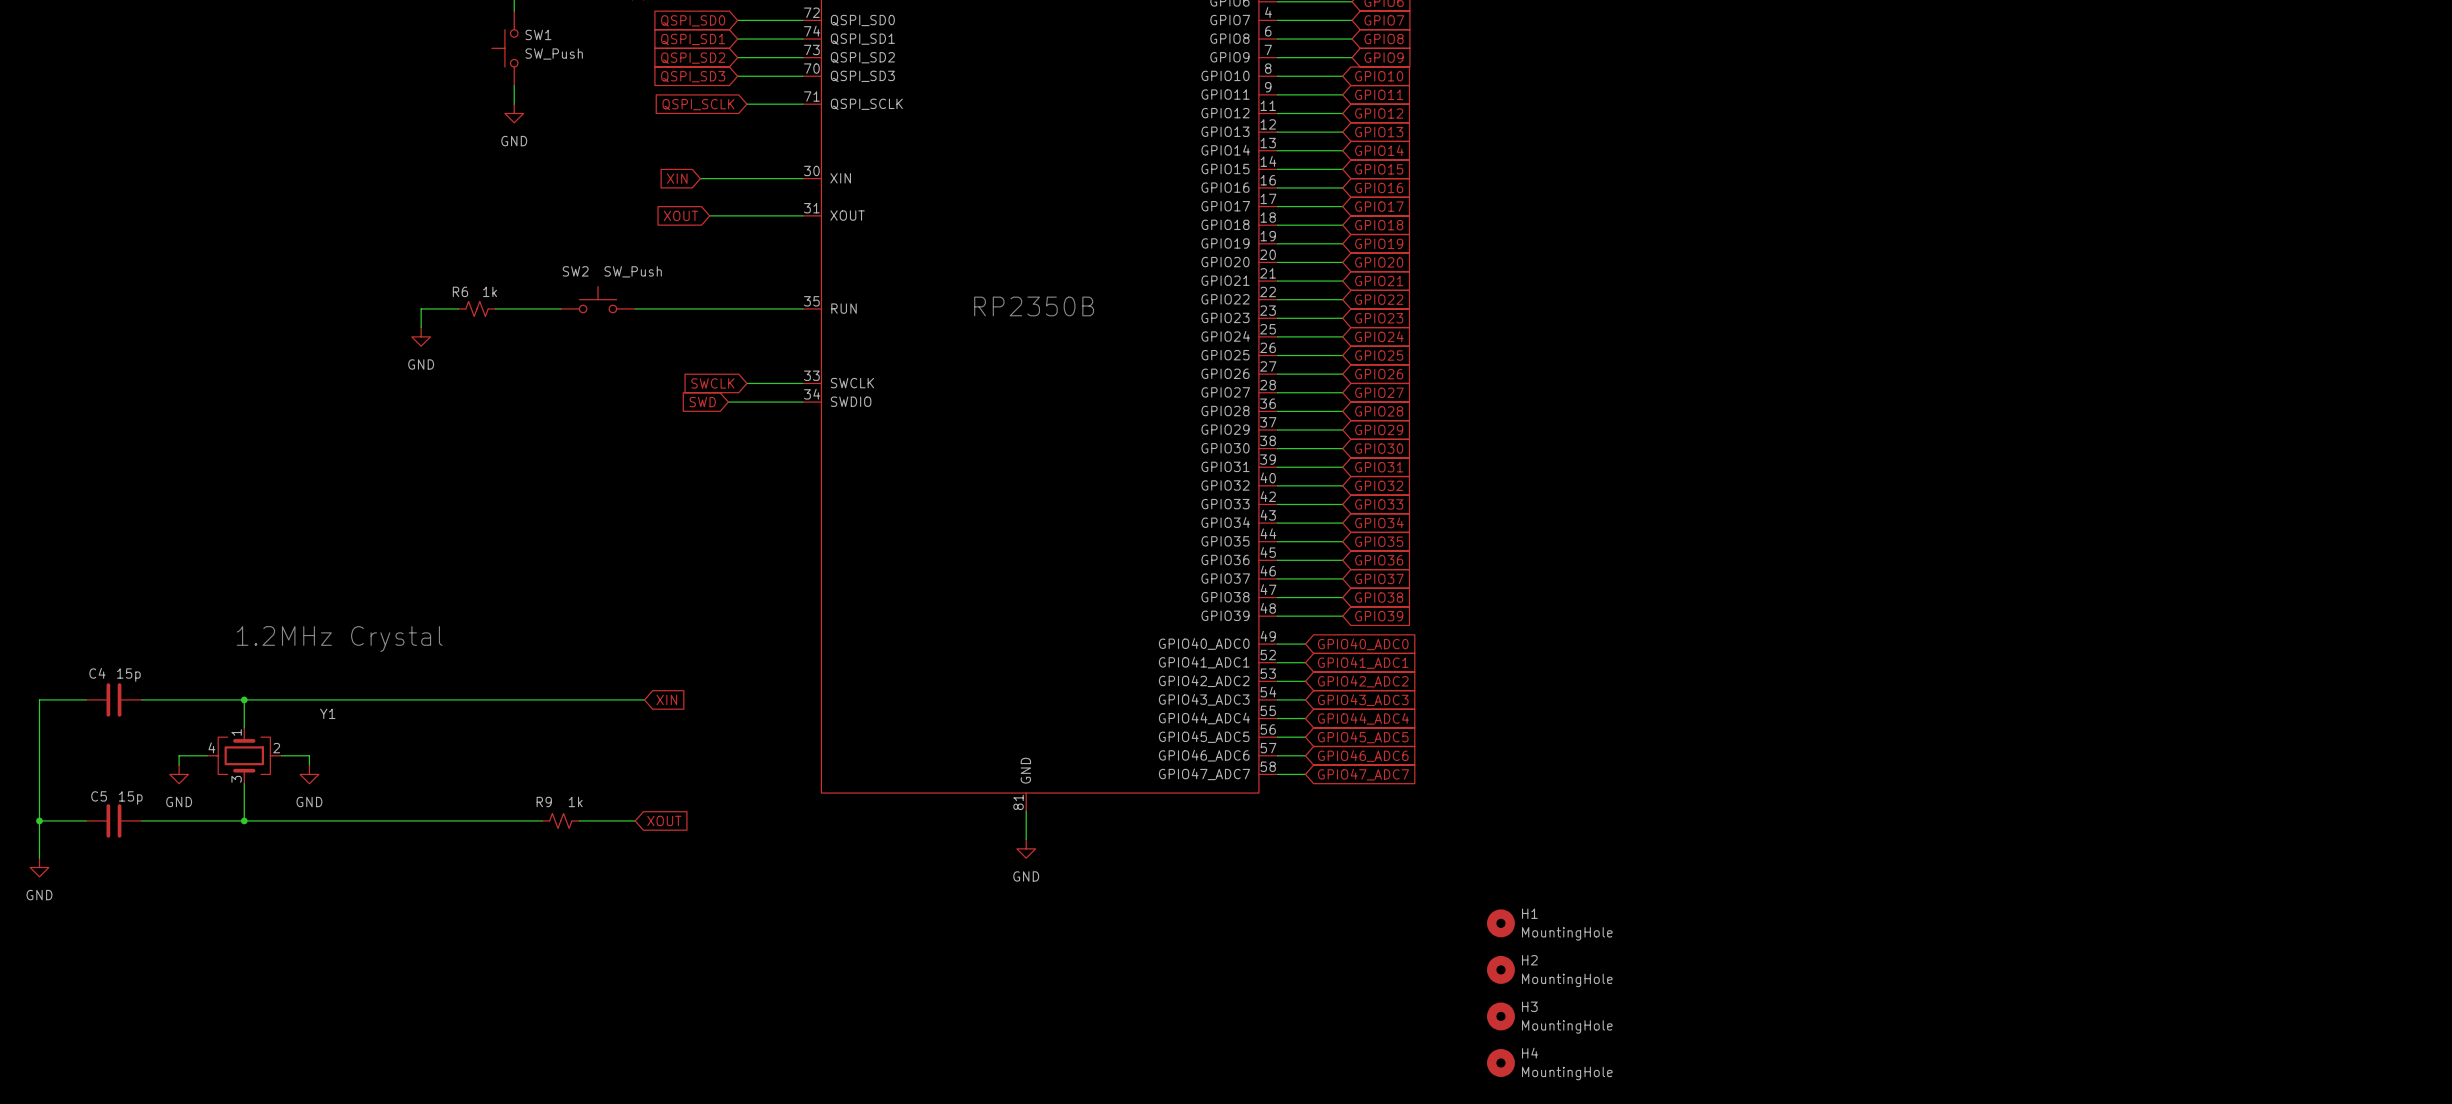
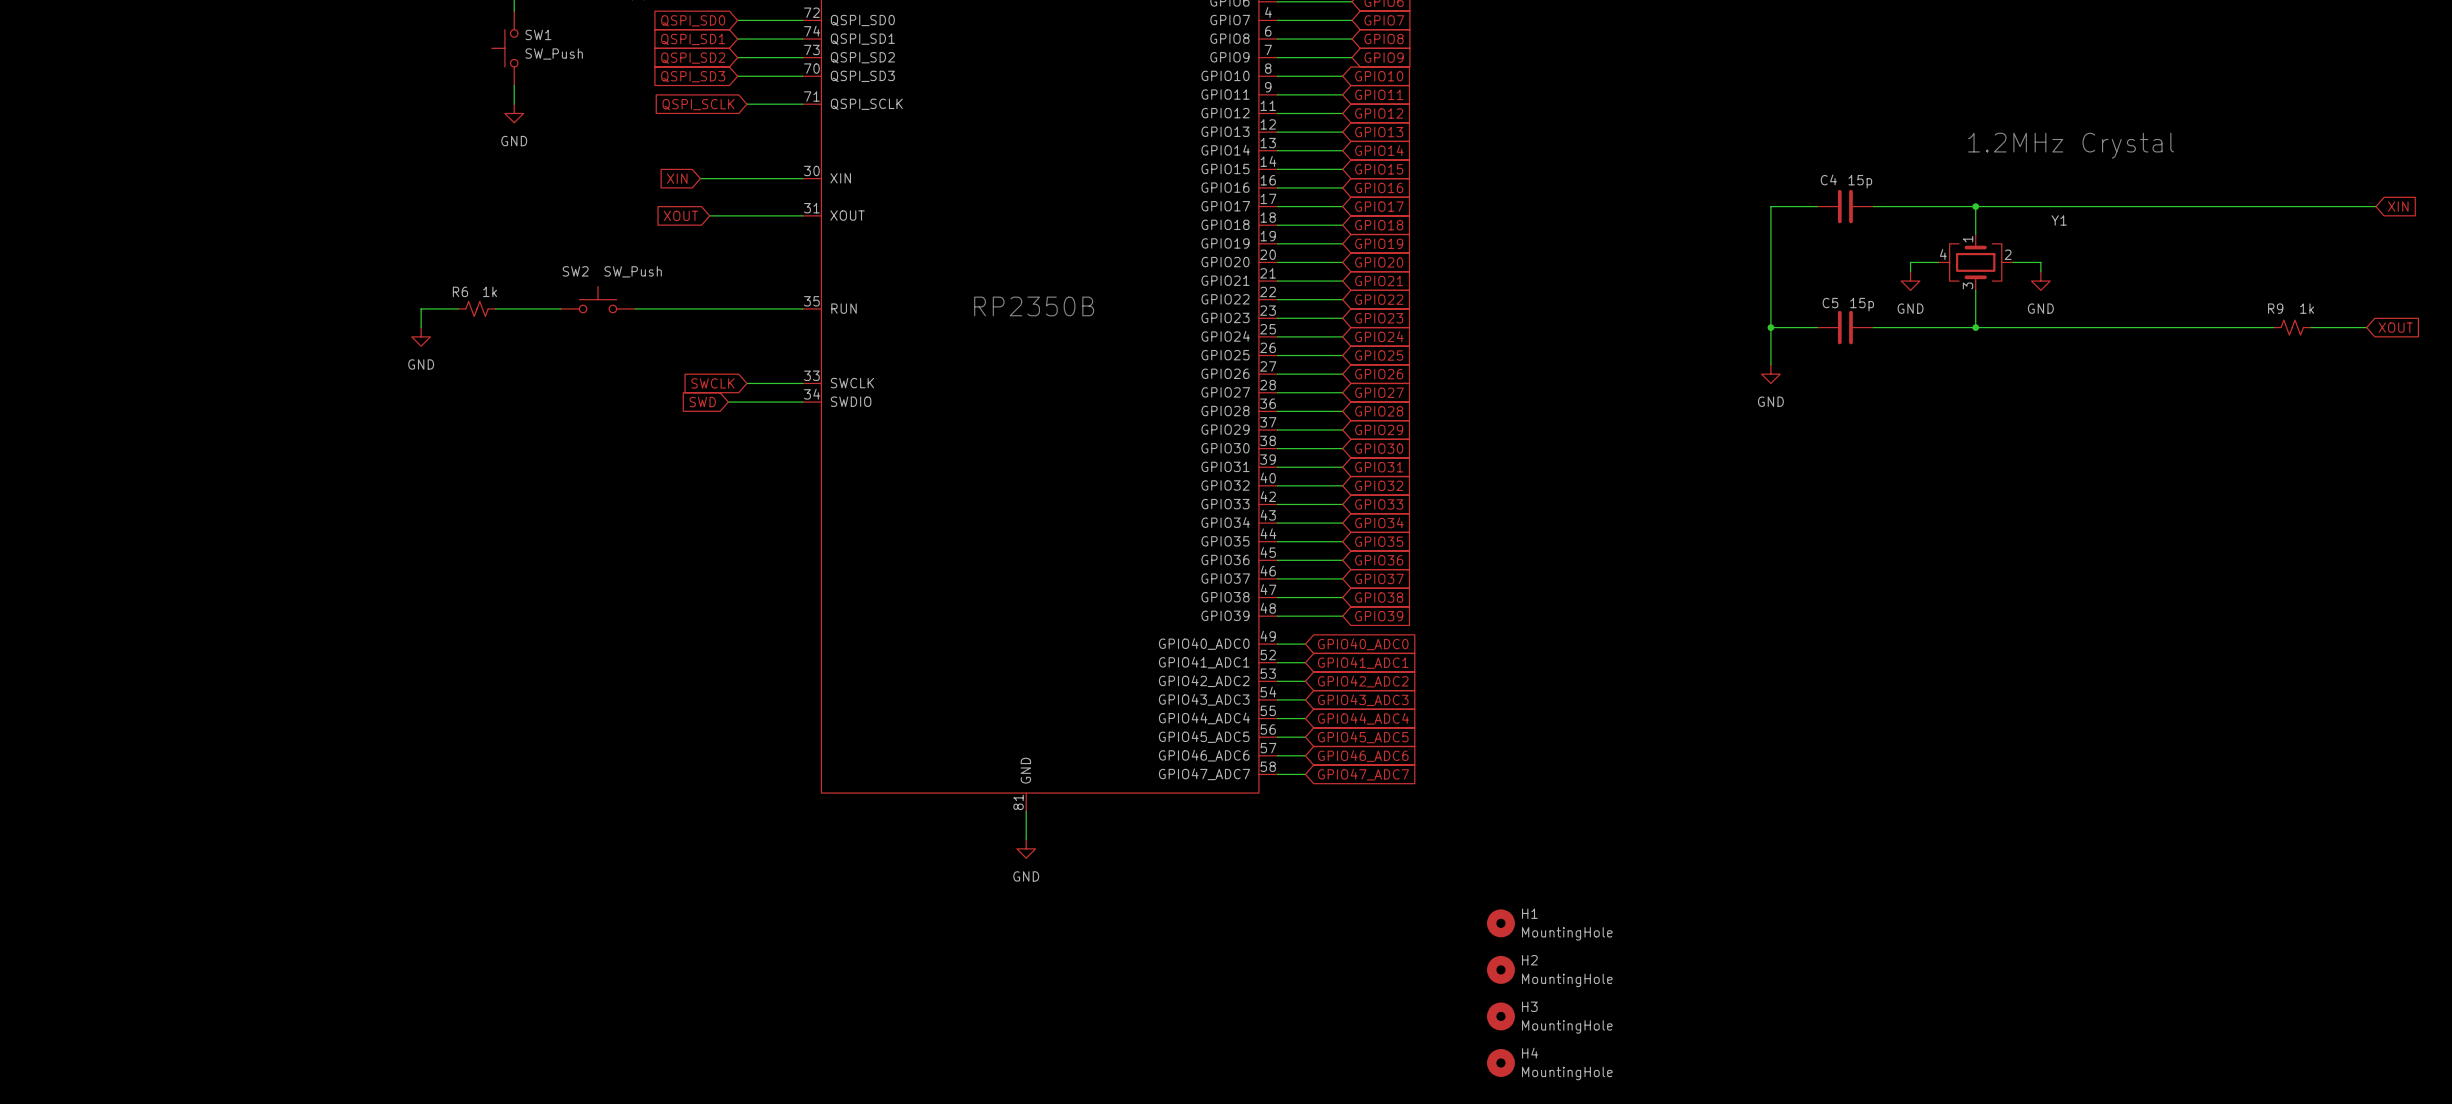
text: none -> 1.2MHz Crystal (2071, 145)
wire: none -> (1817, 206) (1770, 206) (1770, 364)
wire: none -> (1873, 206) (2375, 206)
wire: none -> (1975, 206) (1975, 234)
junction: none -> (1975, 206)
global label: none -> XIN (2398, 206)
wire: none -> (1938, 262) (1910, 262) (1910, 271)
wire: none -> (2012, 262) (2040, 262) (2040, 271)
power symbol: none -> GND (1910, 281)
power symbol: none -> GND (2040, 281)
wire: none -> (1975, 290) (1975, 327)
wire: none -> (1770, 327) (1817, 327)
junction: none -> (1770, 327)
wire: none -> (1873, 327) (2273, 327)
junction: none -> (1975, 327)
wire: none -> (2310, 327) (2366, 327)
global label: none -> XOUT (2395, 327)
power symbol: none -> GND (1770, 374)
text: 1.2MHz Crystal (339, 639) -> none
wire: (86, 699) (39, 699) (39, 858) -> none
C4 position: (113, 699) -> (1845, 206)
wire: (141, 699) (644, 699) -> none
wire: (244, 699) (244, 727) -> none
junction: (244, 699) -> none
global label: XIN (666, 699) -> none
wire: (207, 755) (179, 755) (179, 765) -> none
Y1 position: (244, 755) -> (1975, 262)
wire: (281, 755) (309, 755) (309, 765) -> none
power symbol: GND (179, 774) -> none
power symbol: GND (309, 774) -> none
wire: (244, 783) (244, 820) -> none
wire: (39, 820) (86, 820) -> none
junction: (39, 820) -> none
C5 position: (113, 820) -> (1845, 327)
wire: (141, 820) (542, 820) -> none
junction: (244, 820) -> none
R9 position: (560, 820) -> (2292, 327)
wire: (579, 820) (635, 820) -> none
global label: XOUT (664, 820) -> none
power symbol: GND (39, 867) -> none

